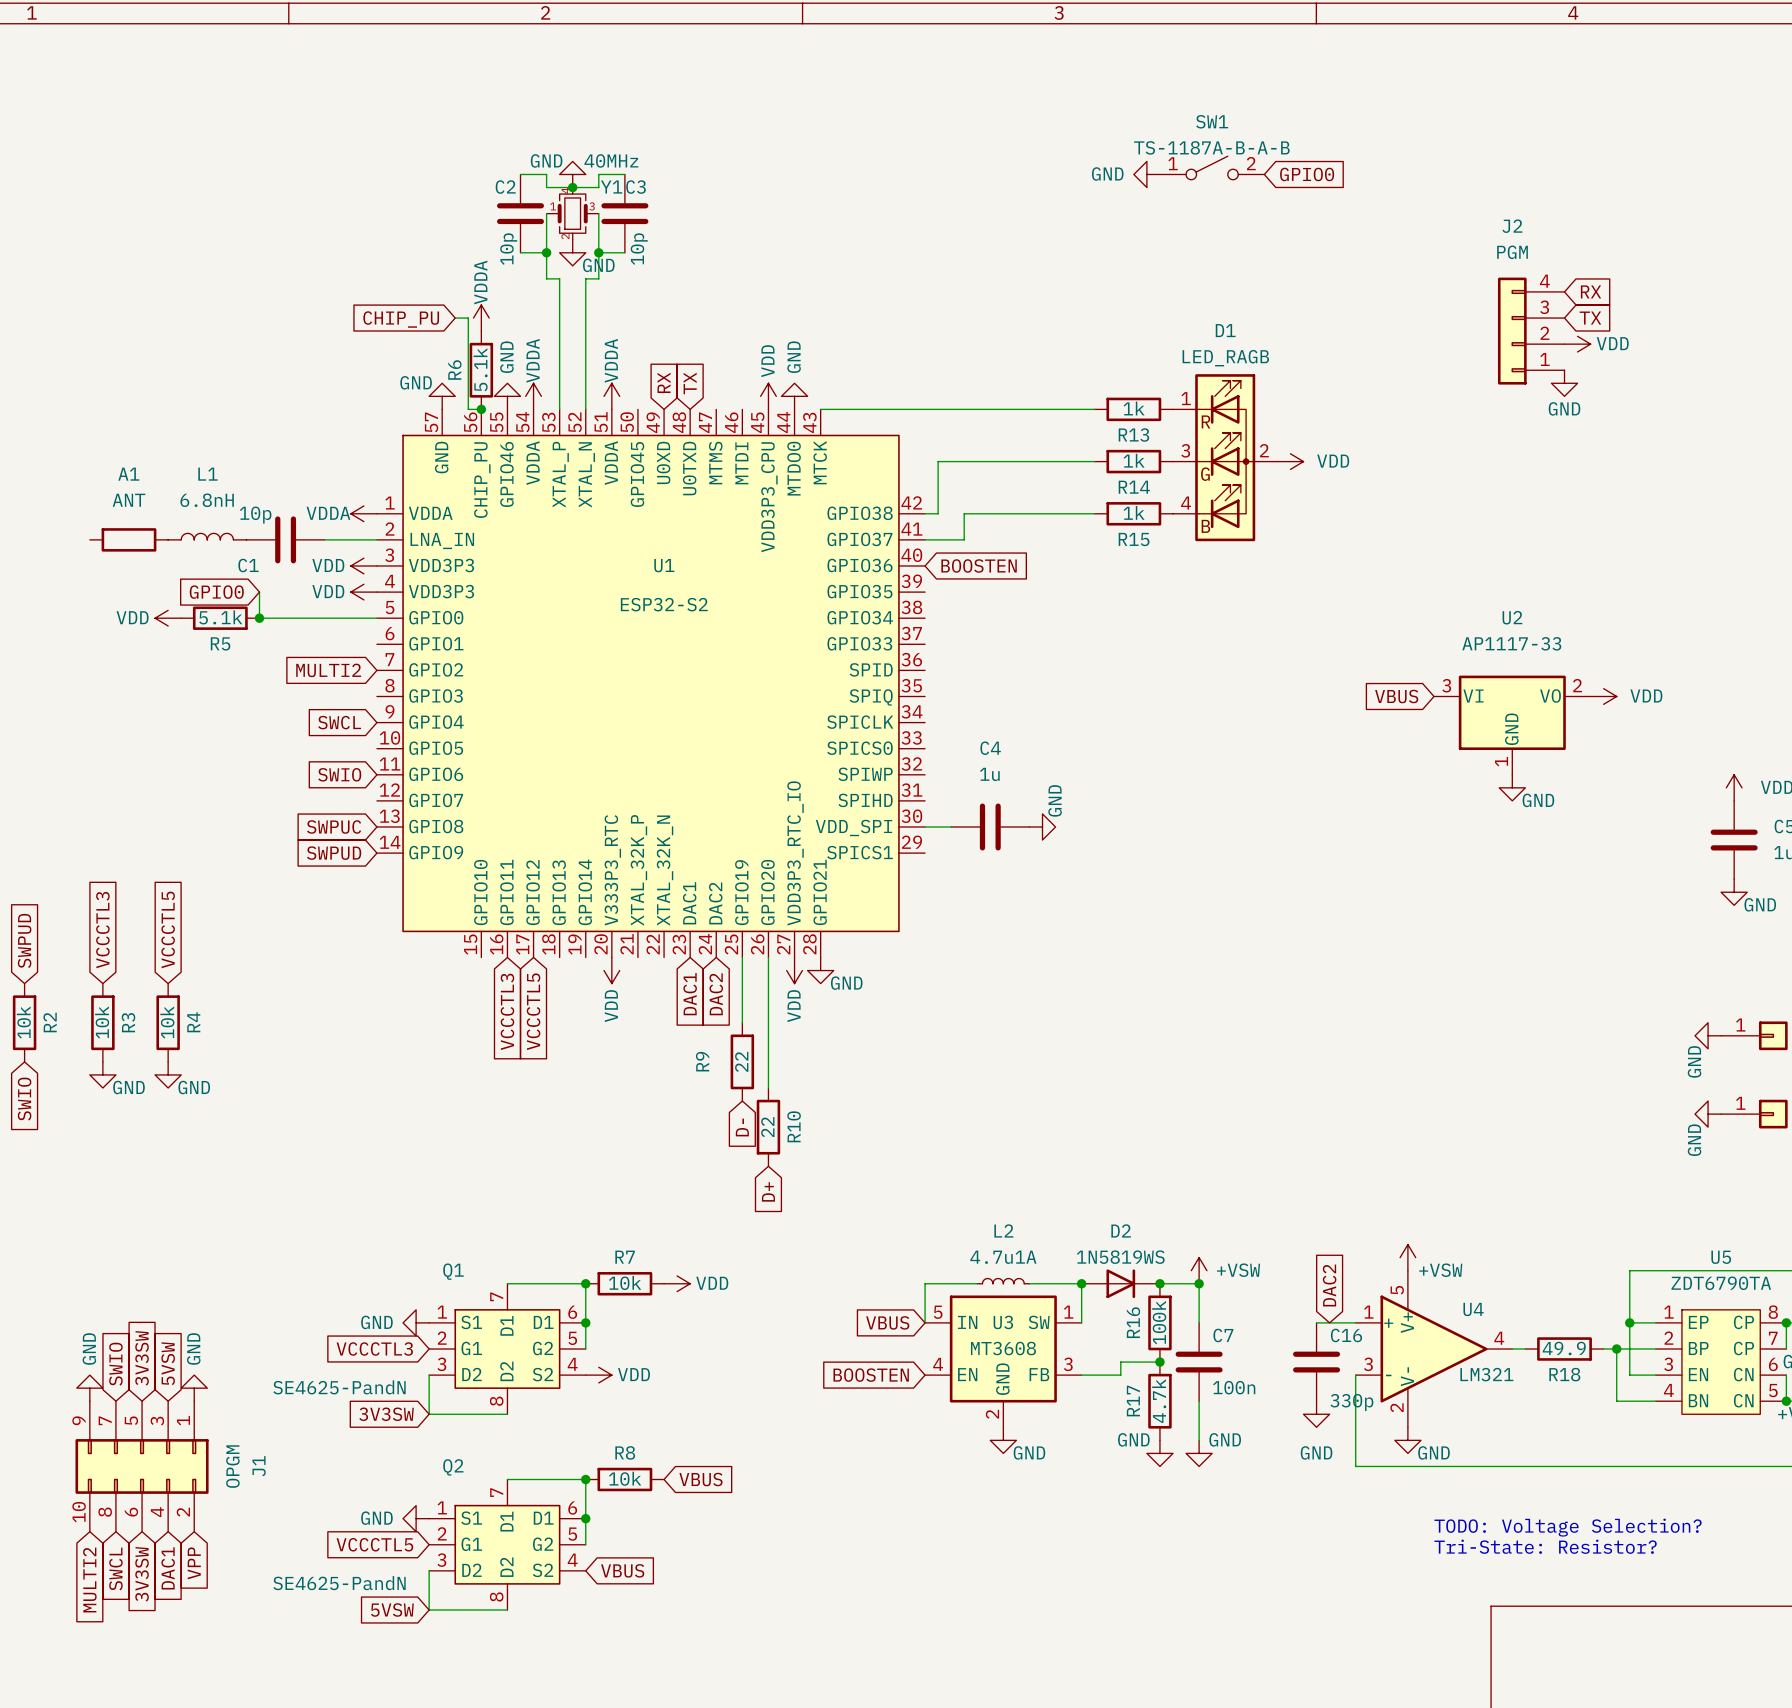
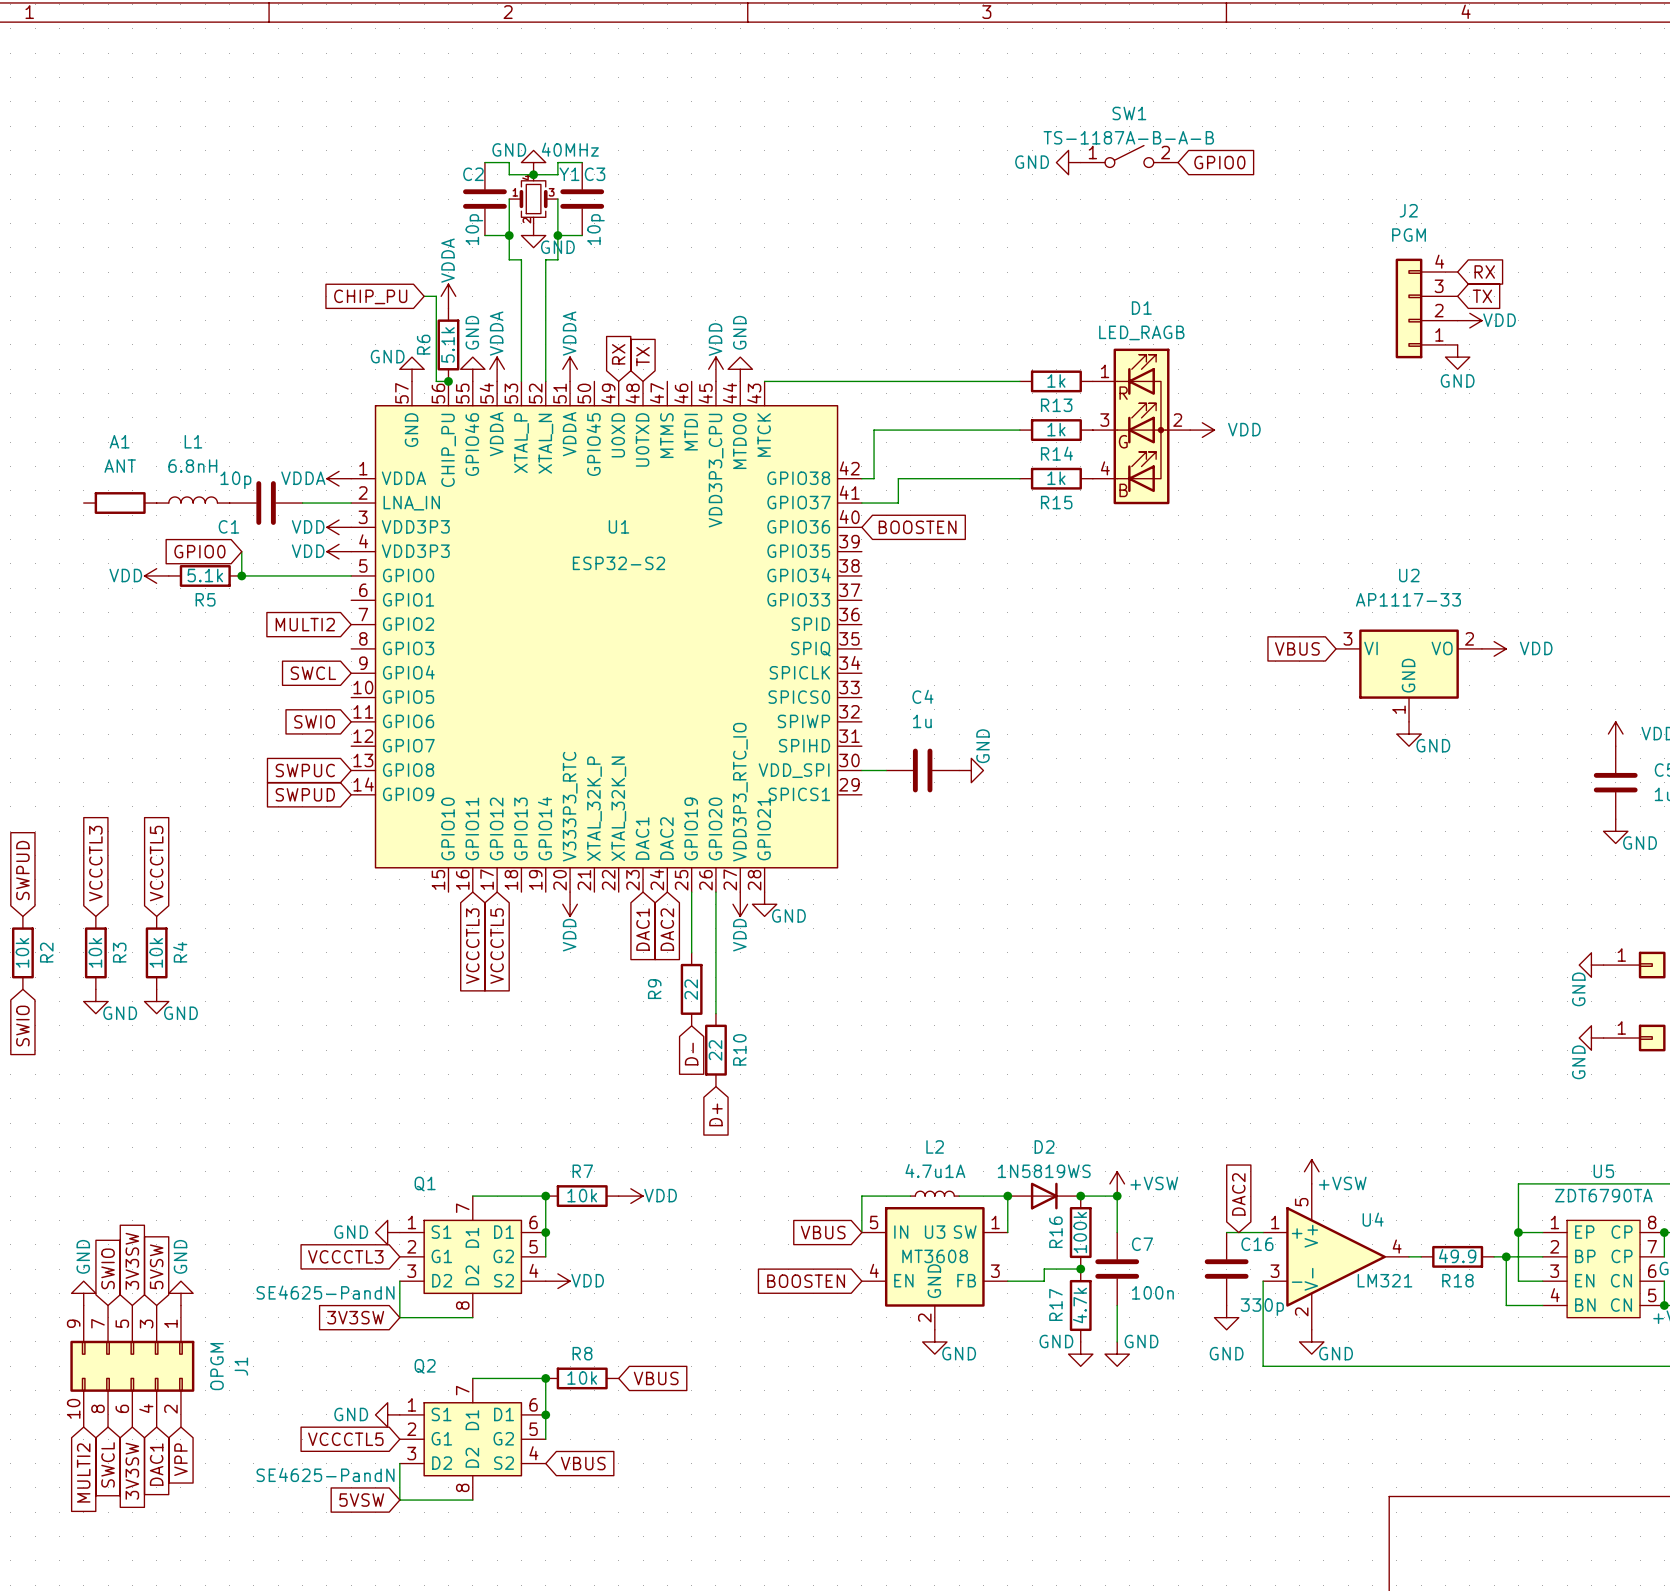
text: TODO: Voltage Selection? (1568, 1527) -> none
text: Tri-State: Resistor? (1545, 1546) -> none

